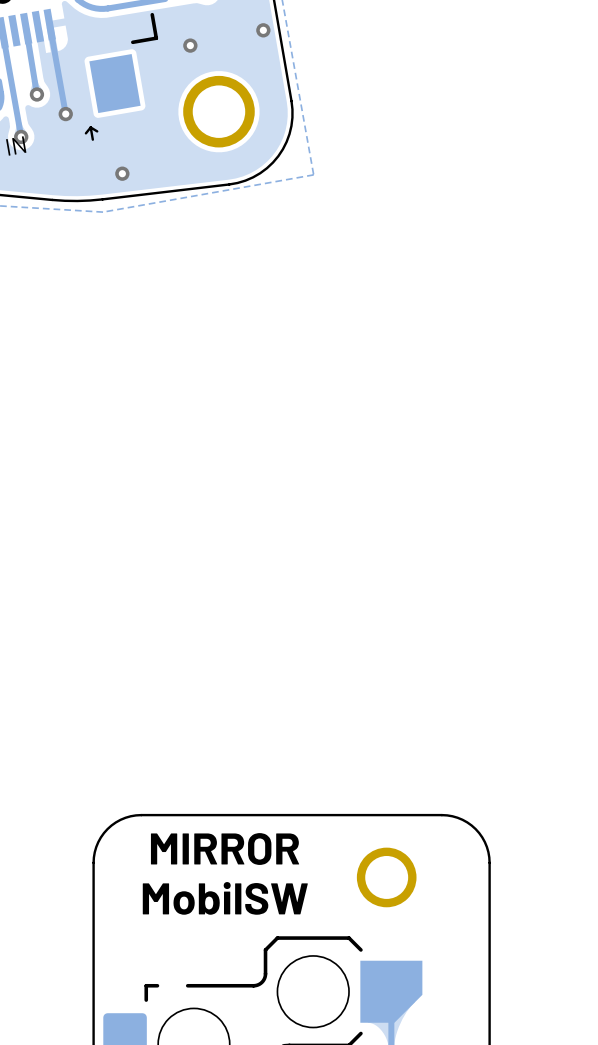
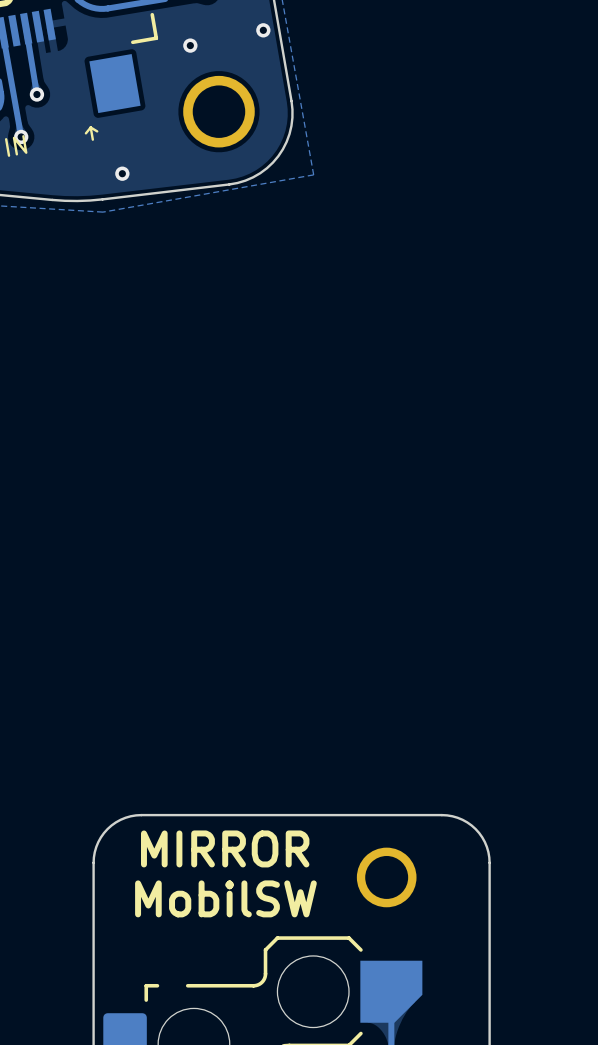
track: (49, 24) (65, 114) -> none
via: (65, 114) -> none

